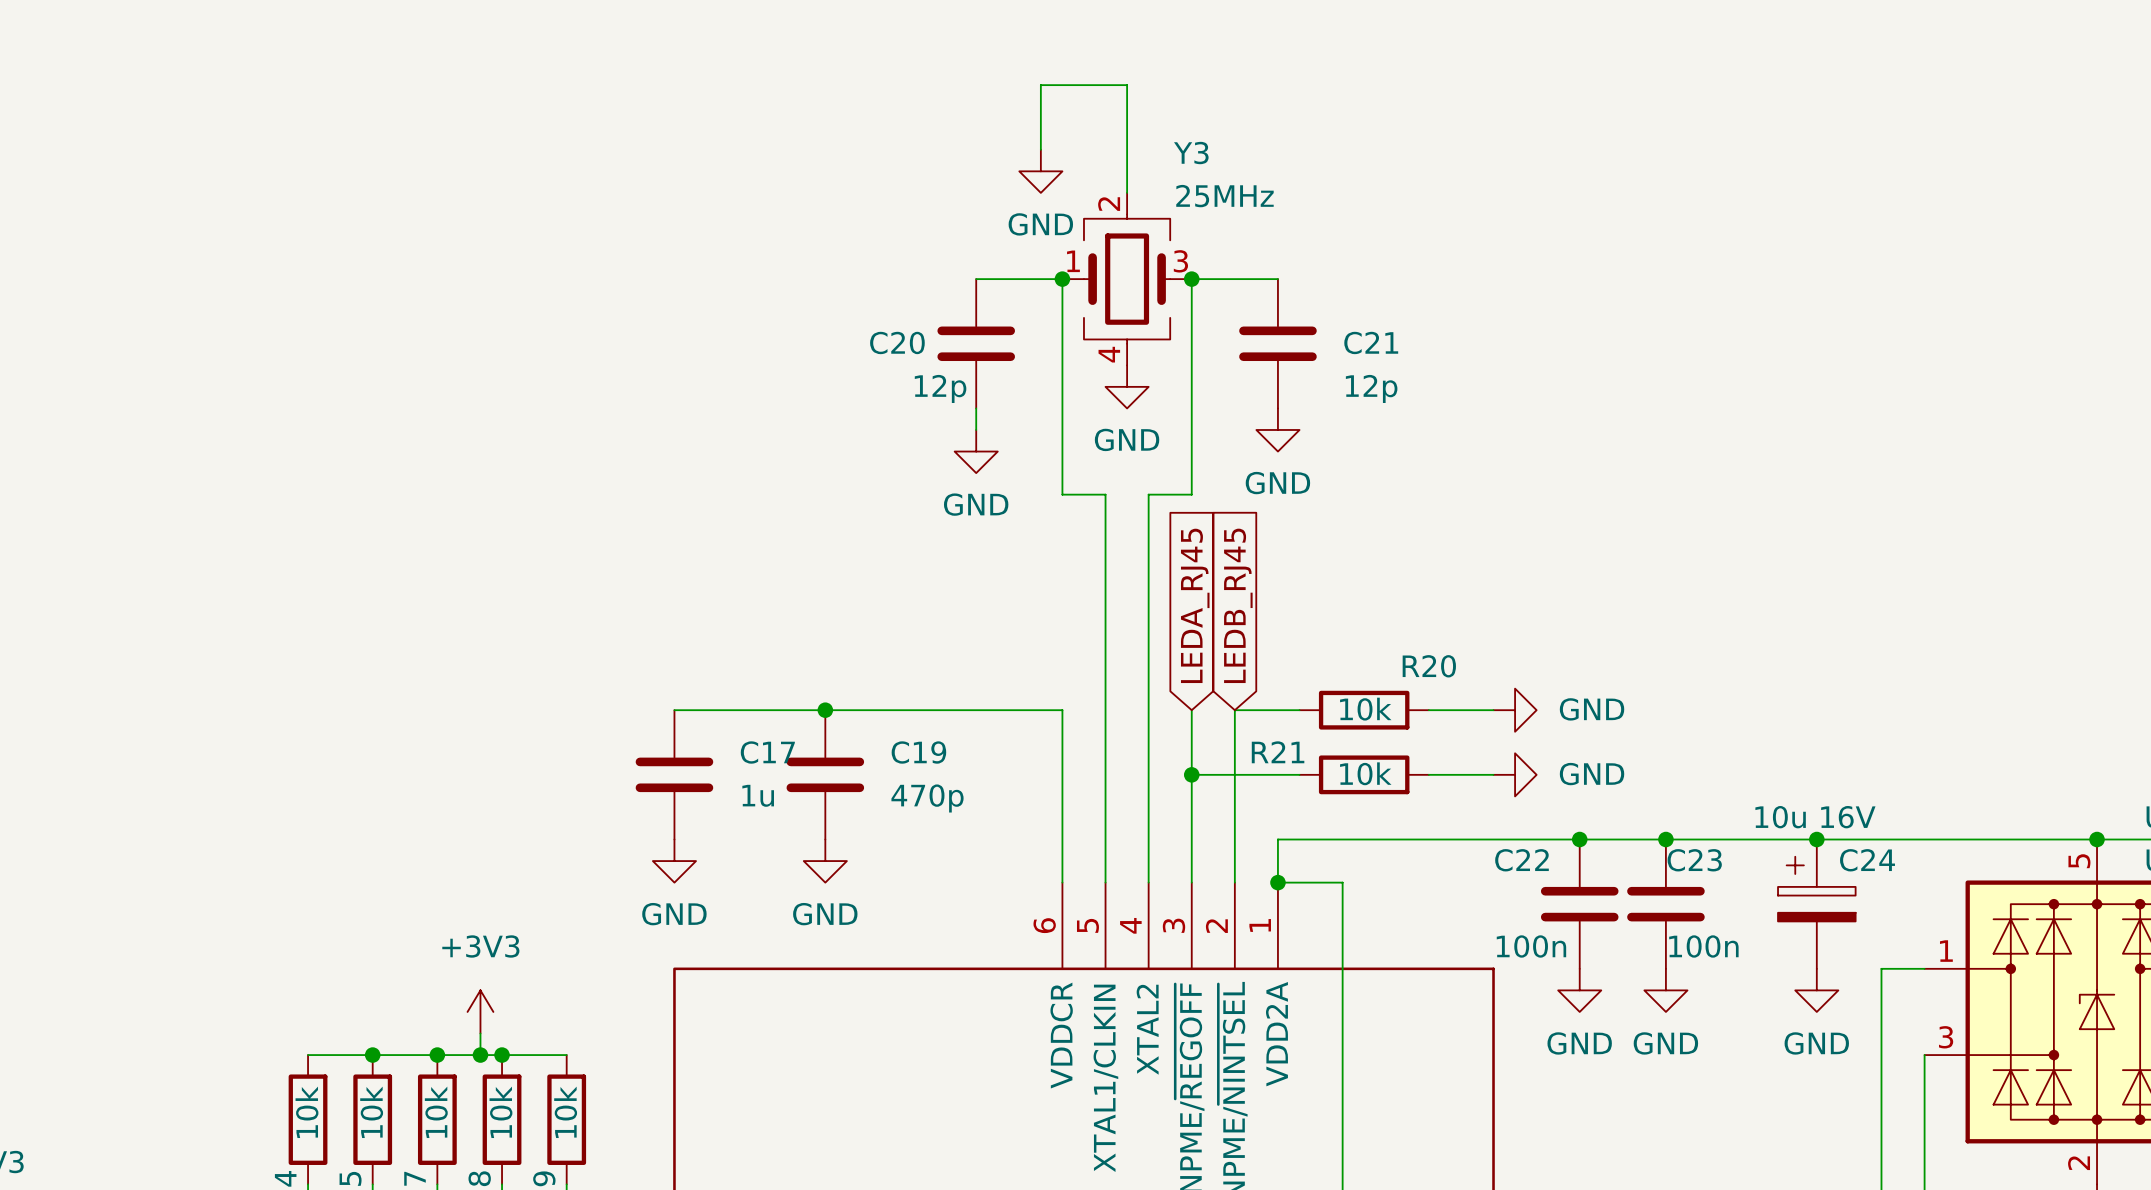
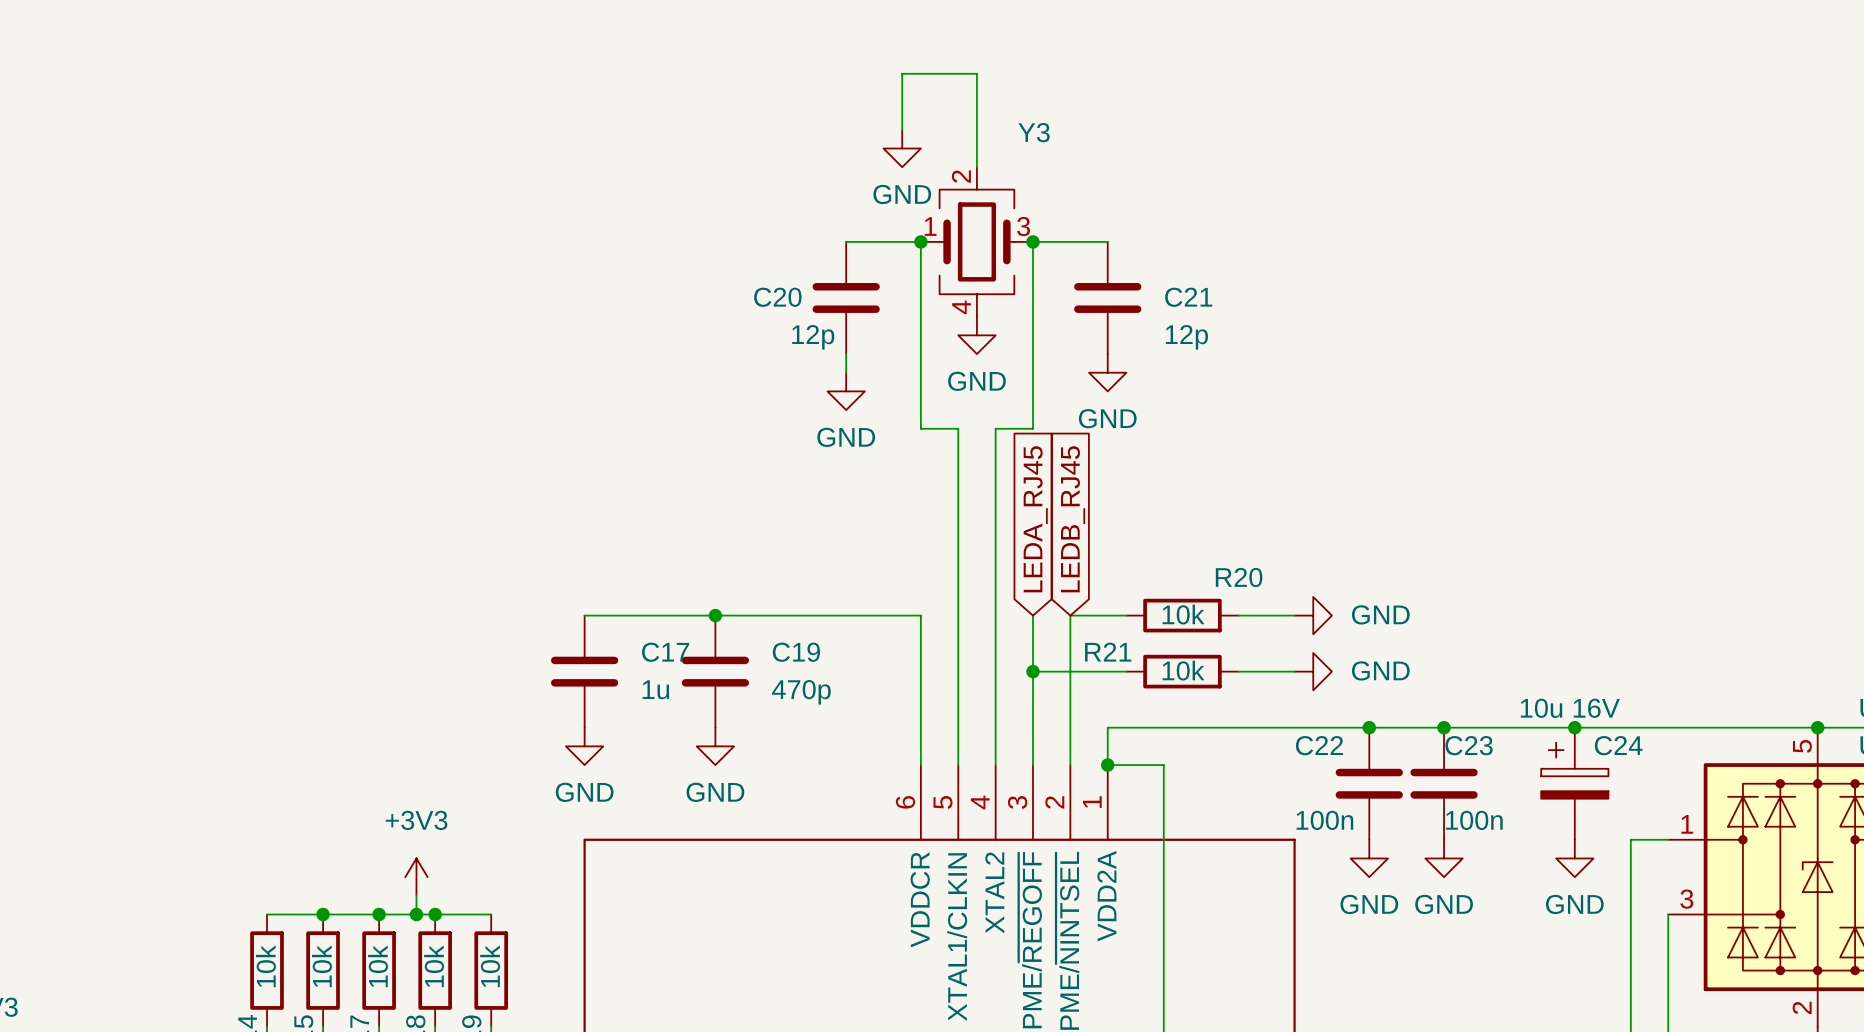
Y3 value: 25MHz (1224, 196) -> none

